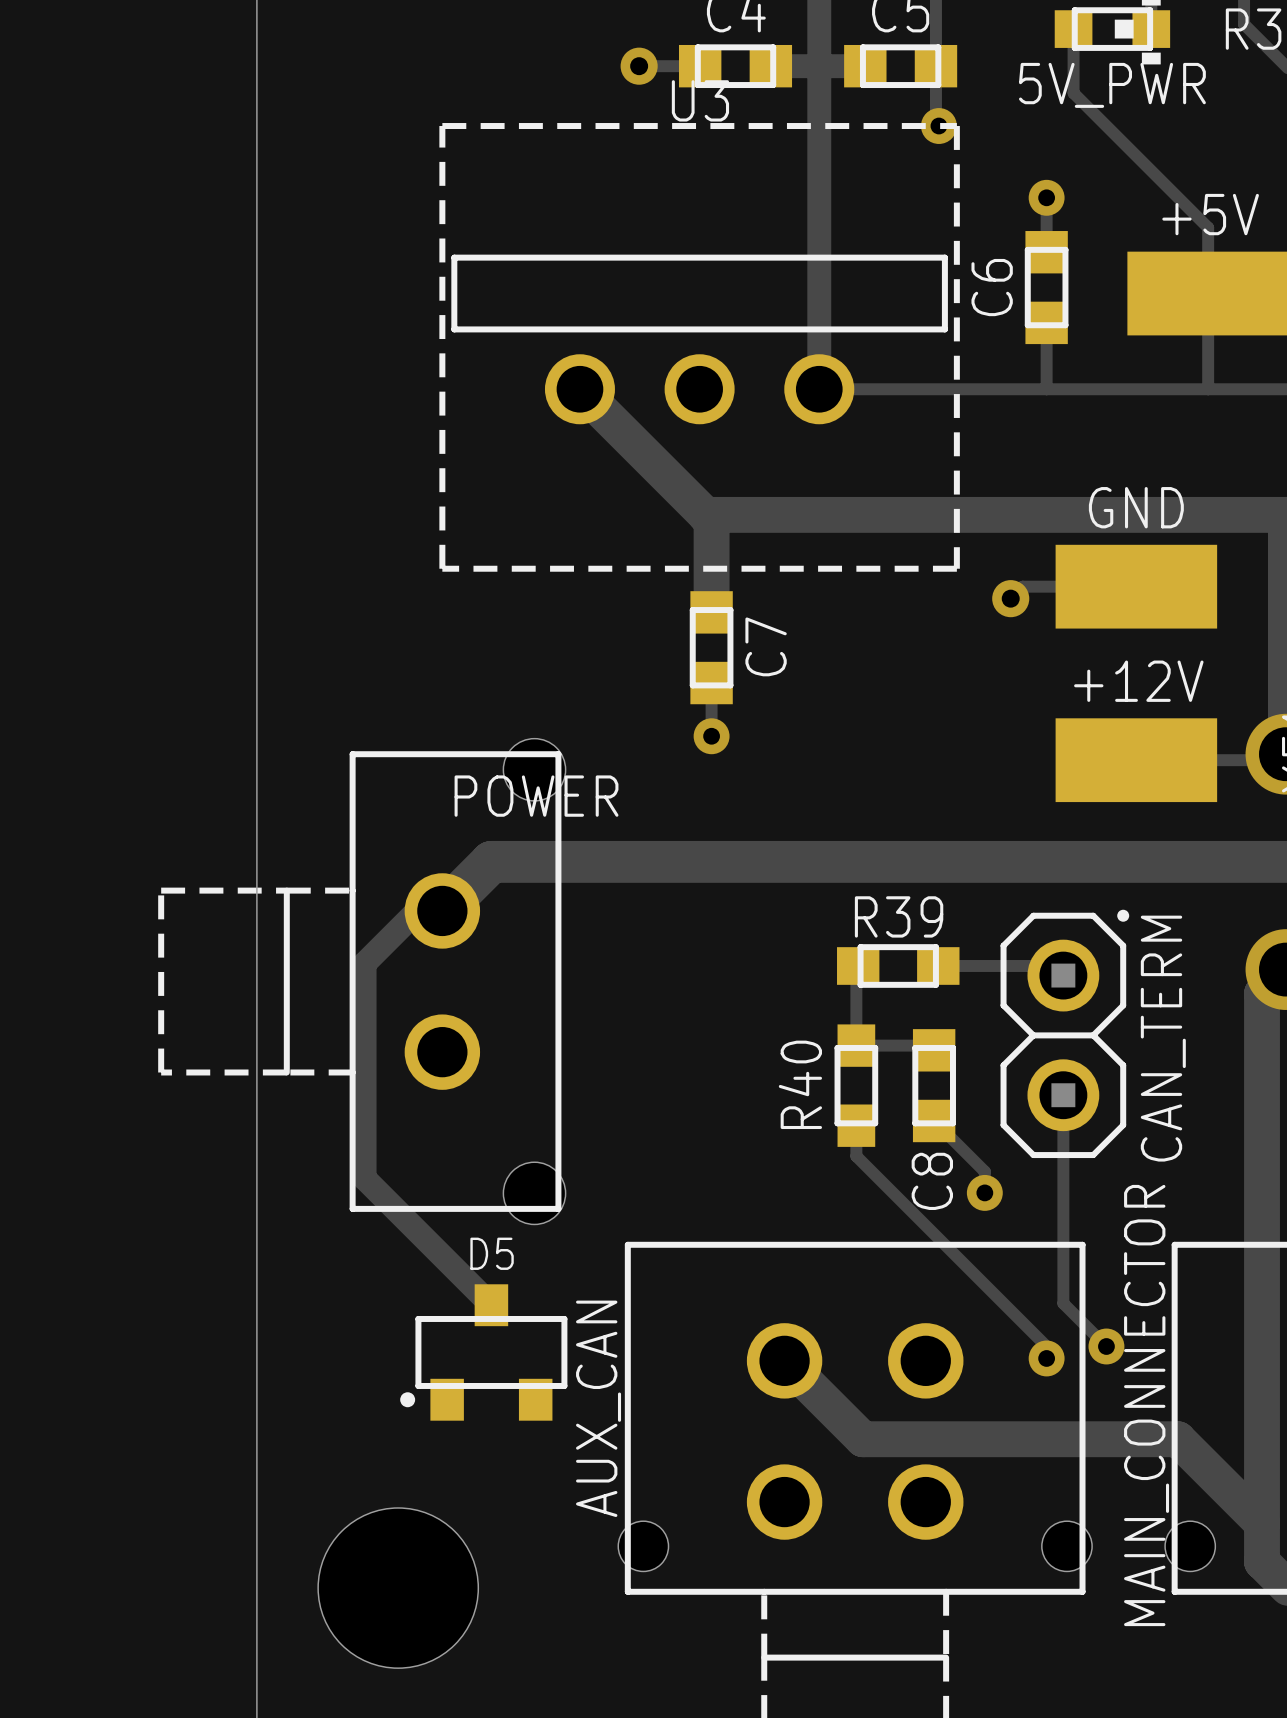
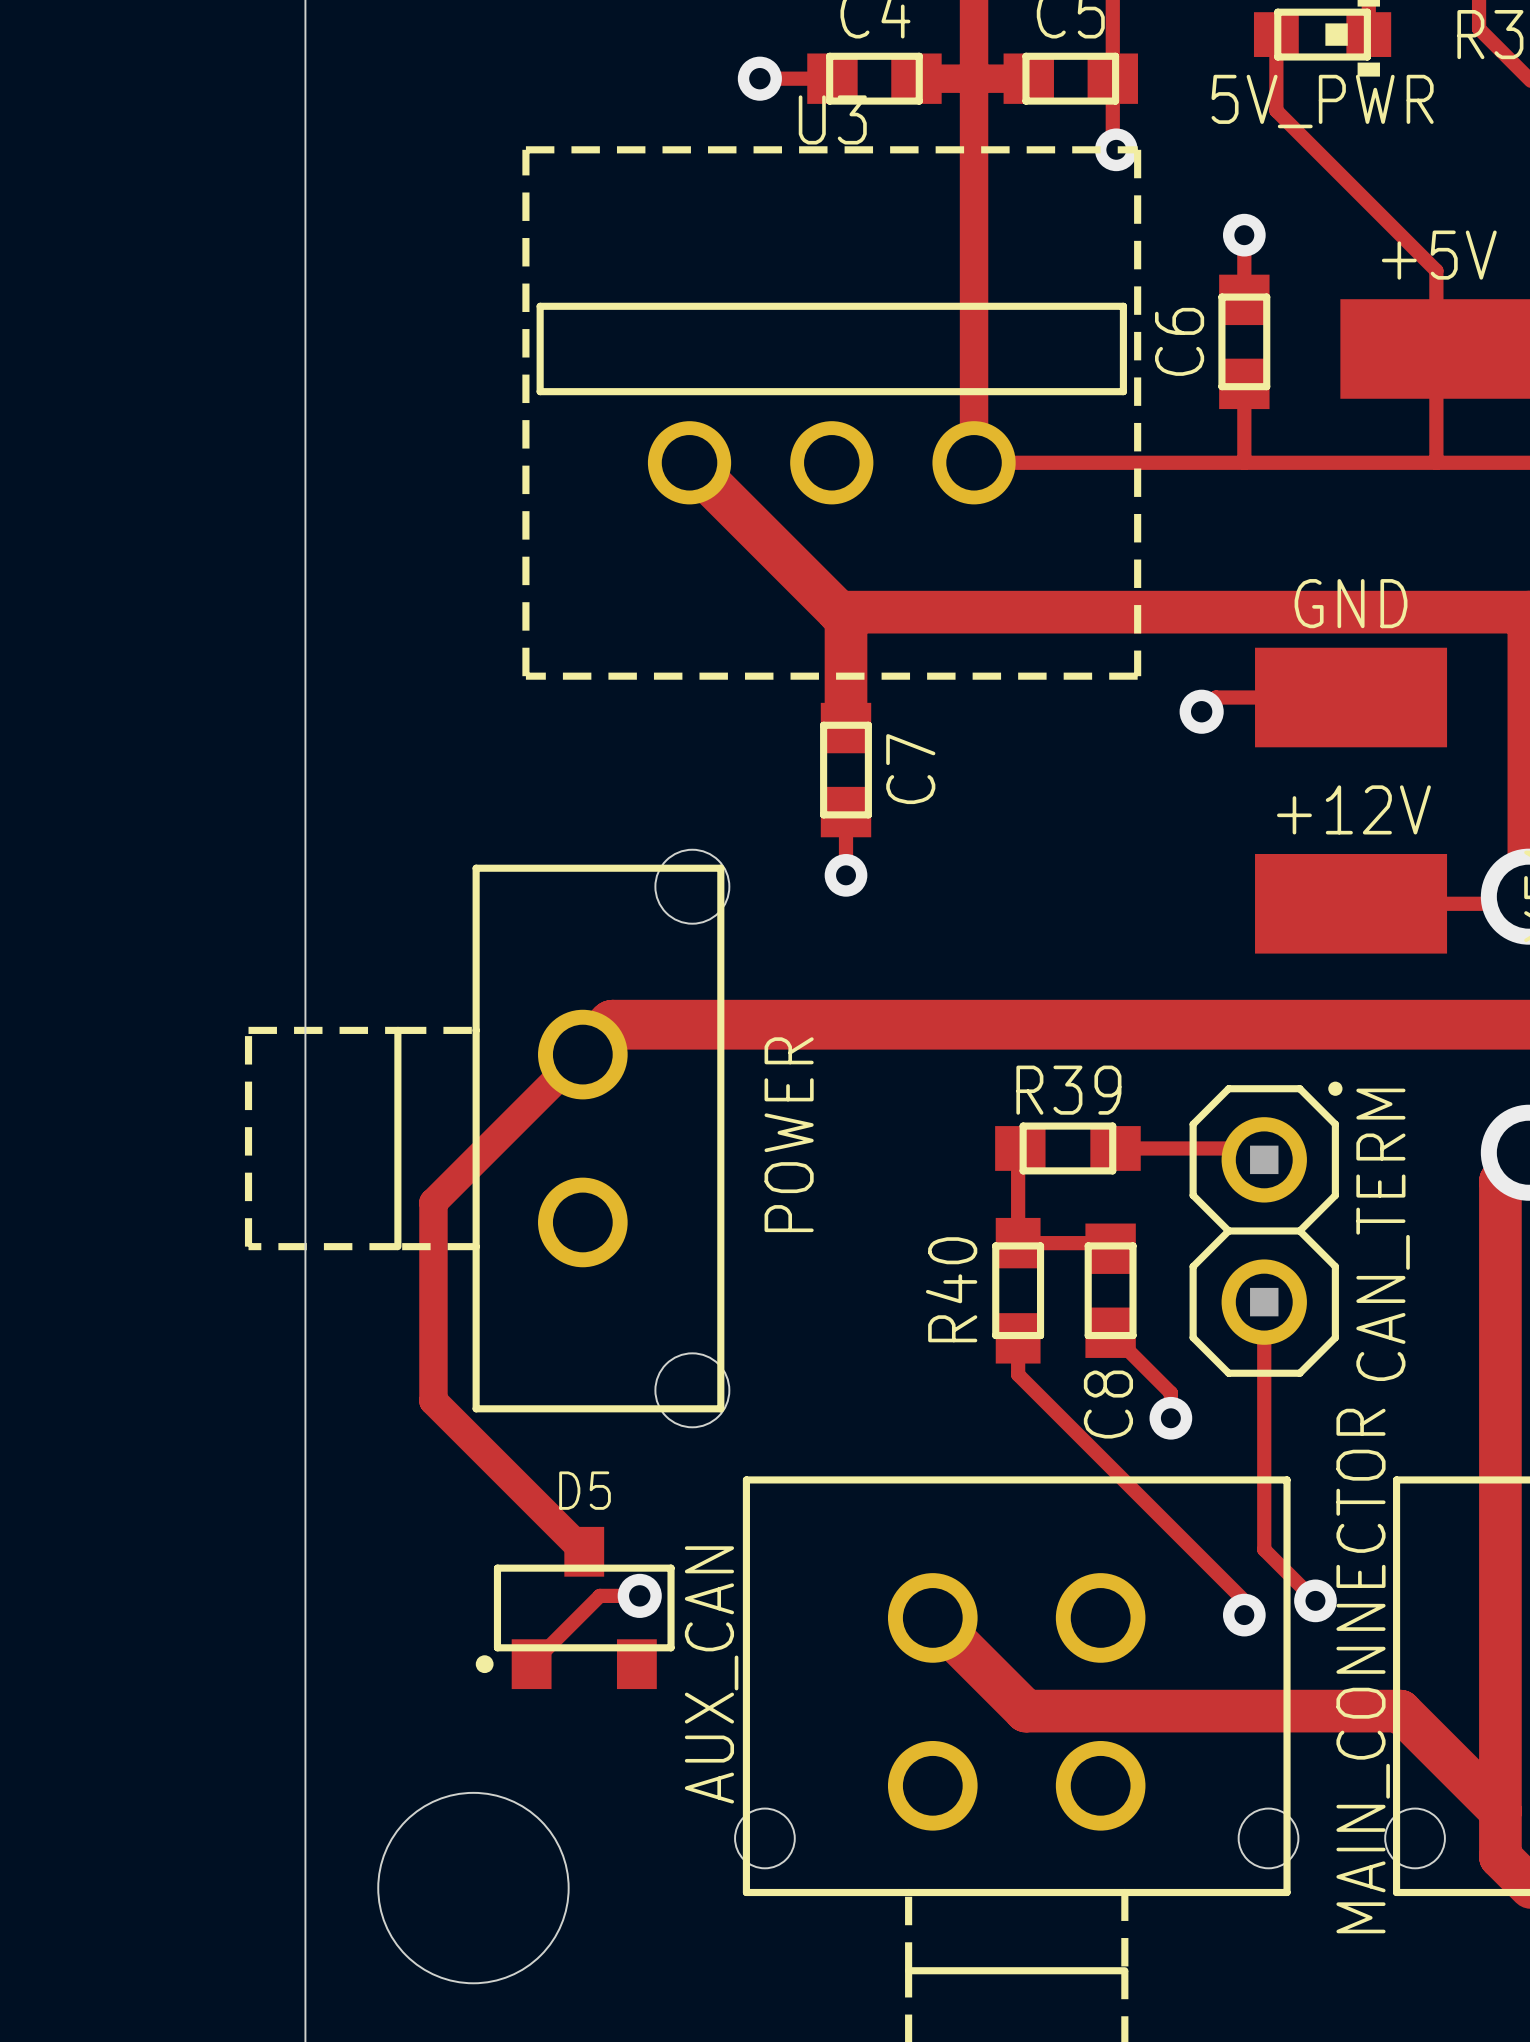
POWER name rotation: 0° (536, 796) -> 90° counterclockwise (789, 1134)
track: (515, 861) (491, 861) (442, 910) (417, 910) (364, 963) (364, 1011) -> (612, 1024) (433, 1202)
POWER position: (361, 981) -> (487, 1138)
track: none -> (639, 1595) (599, 1595) (538, 1657)
via: none -> (639, 1595)

